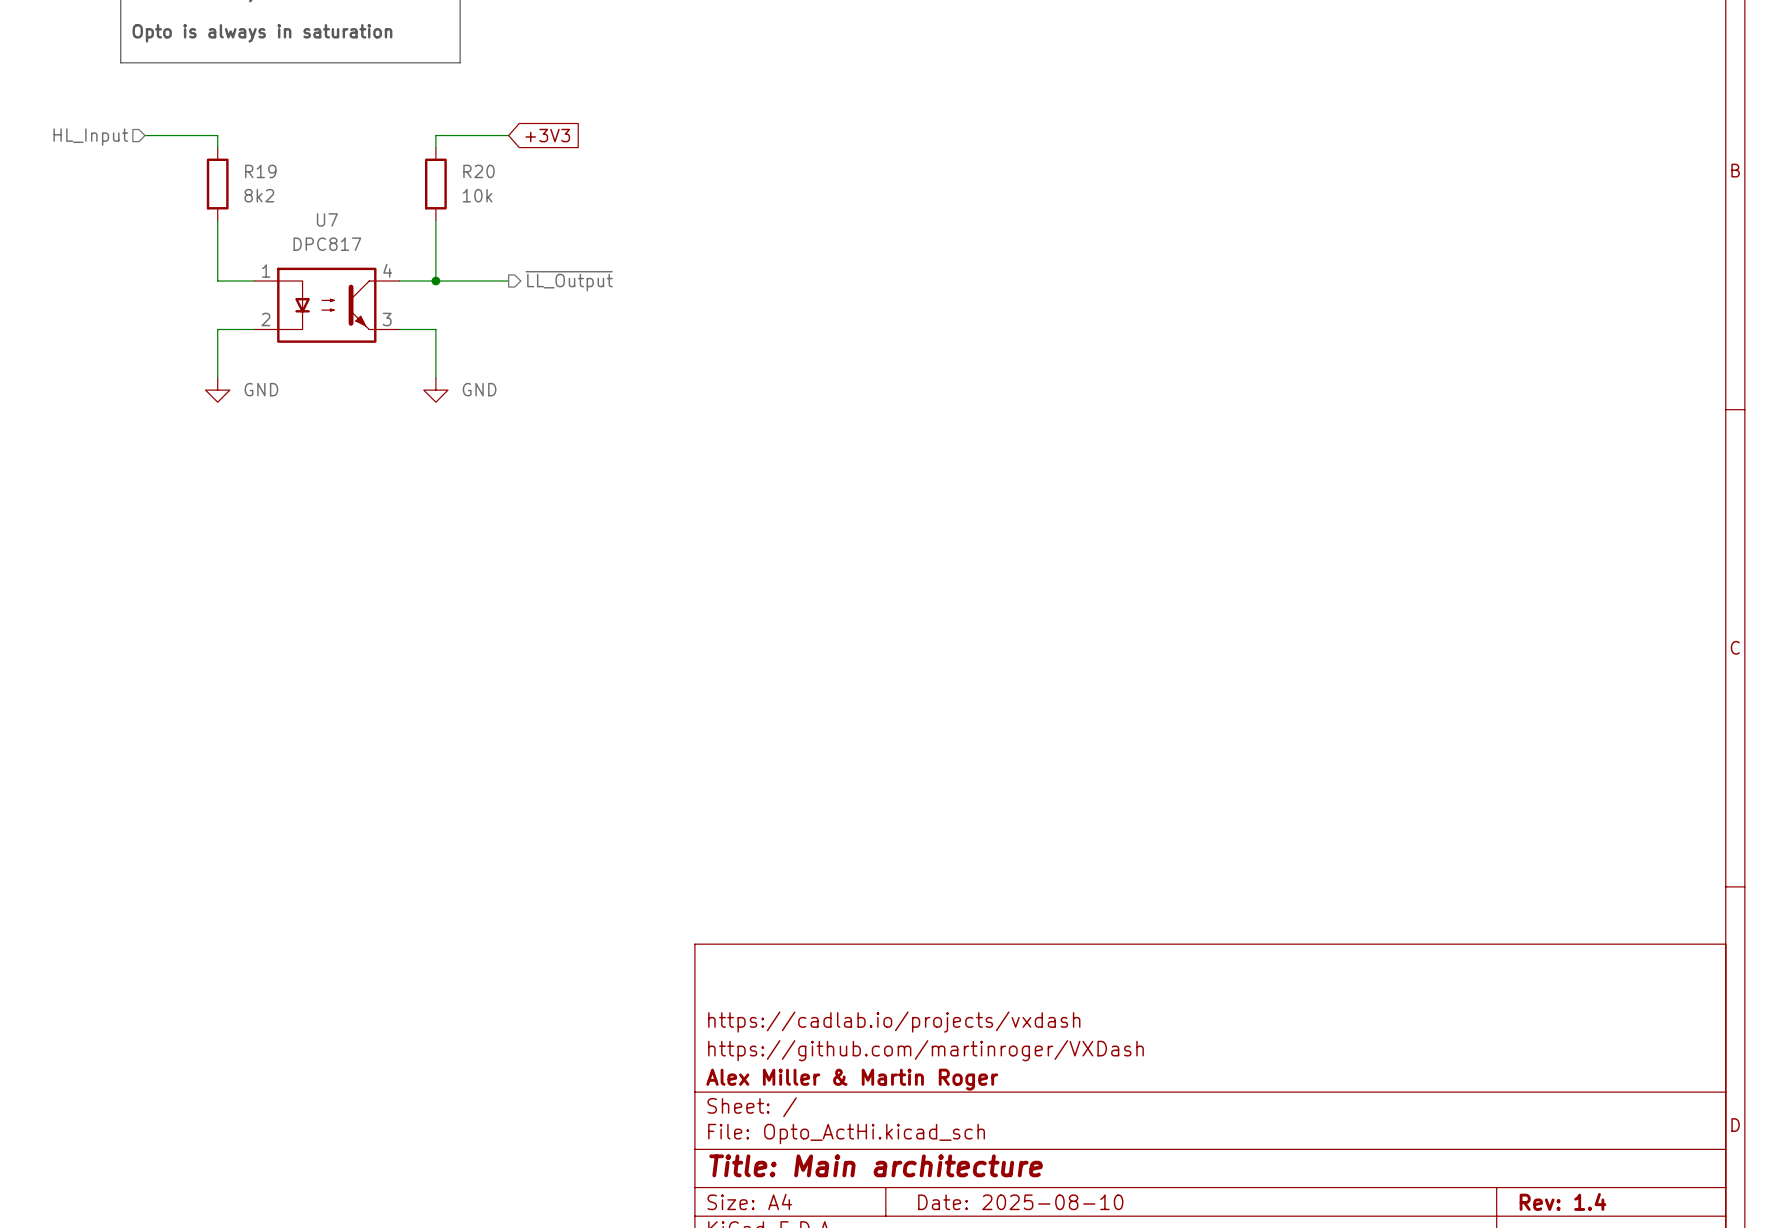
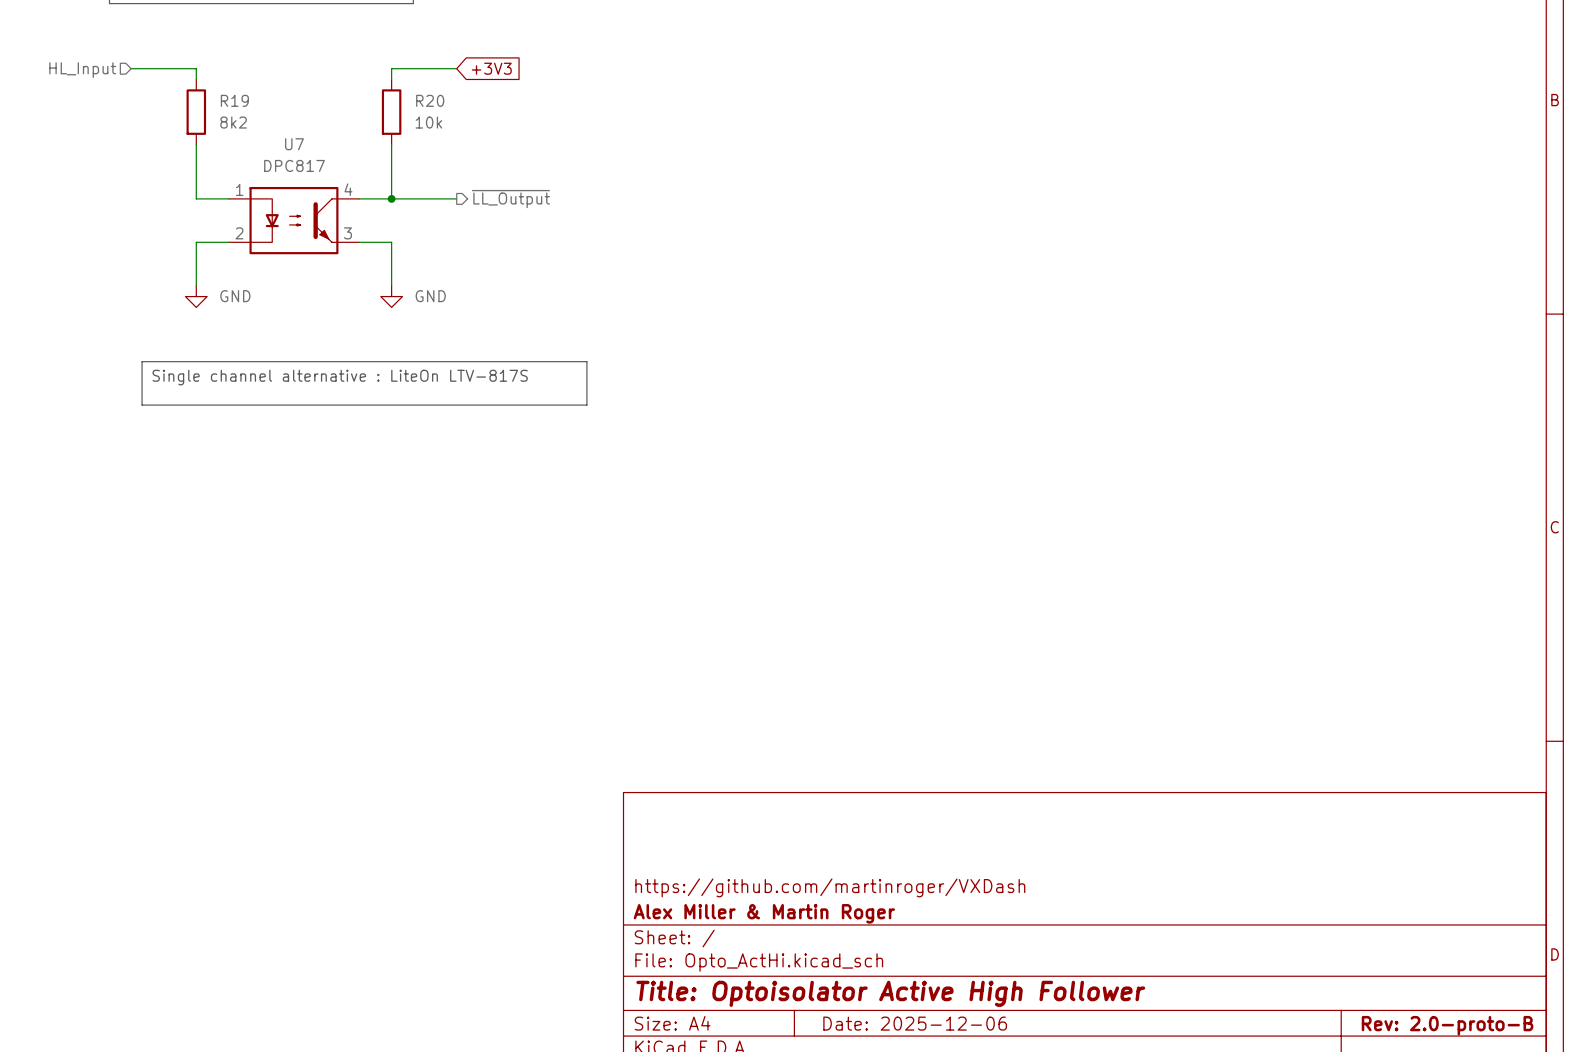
line: none -> (142, 361) (586, 361) (586, 405) (142, 405) (142, 361)
text: none -> Single channel alternative : LiteOn LTV-817S (340, 377)
title block: https://cadlab.io/projects/vxdash (894, 1022) -> none
title block: Title: Main architecture (876, 1165) -> Title: Optoisolator Active High Follower (890, 993)
title block: Rev: 1.4 (1563, 1201) -> Rev: 2.0-proto-B (1447, 1025)
title block: Date: 2025-08-10 (1020, 1202) -> Date: 2025-12-06 (915, 1023)

